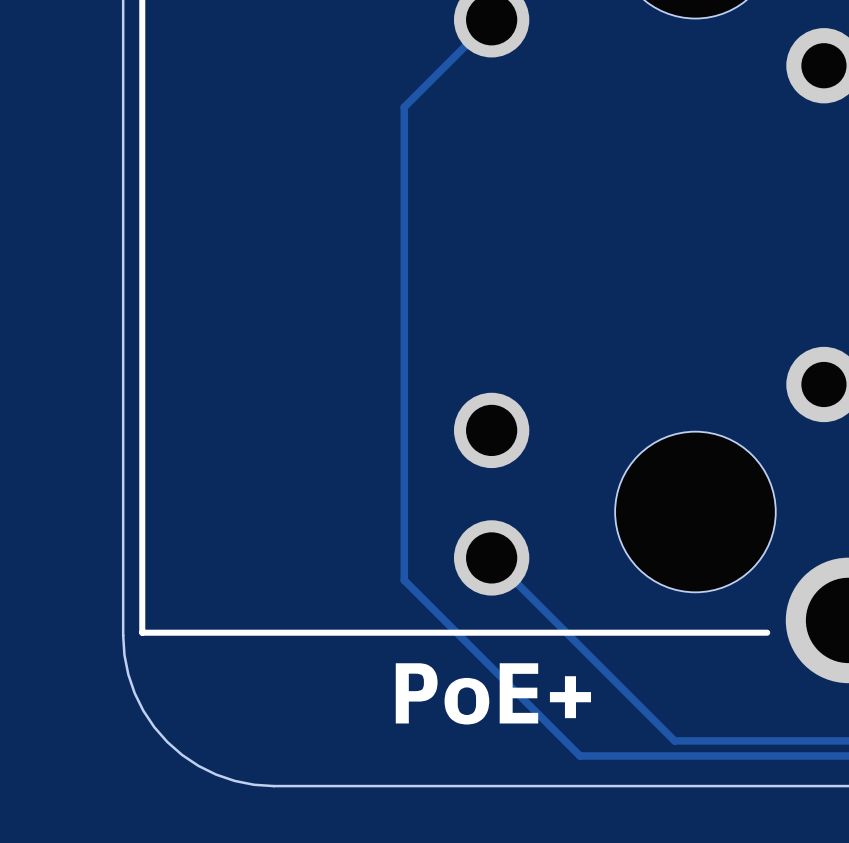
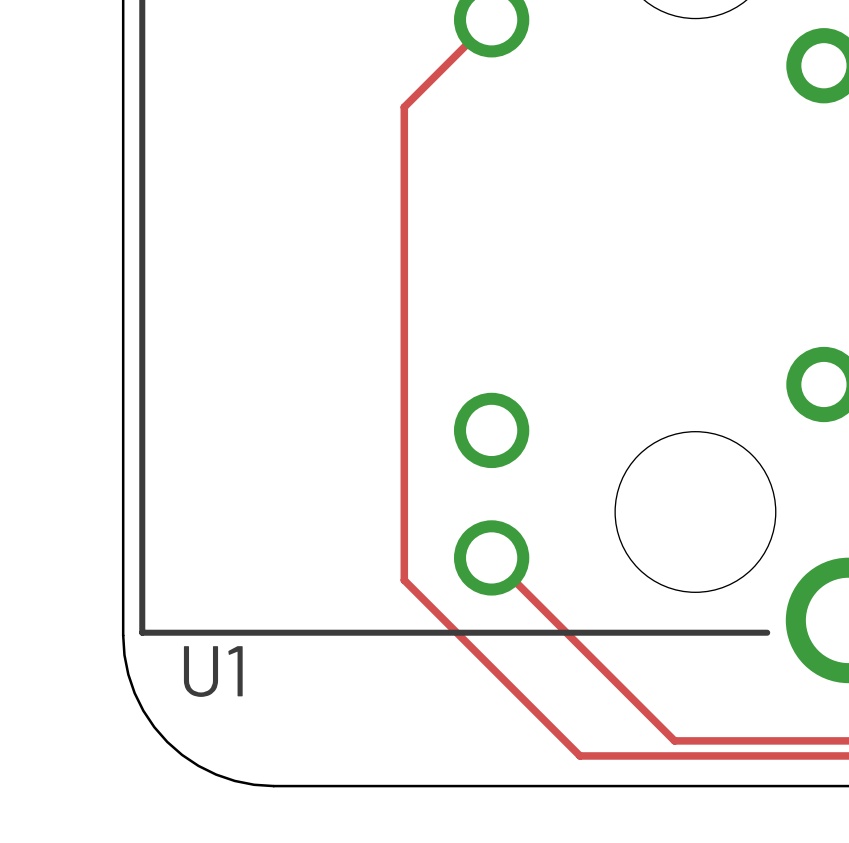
U1 name: none -> U1 (213, 671)
text: PoE+ (493, 693) -> none

